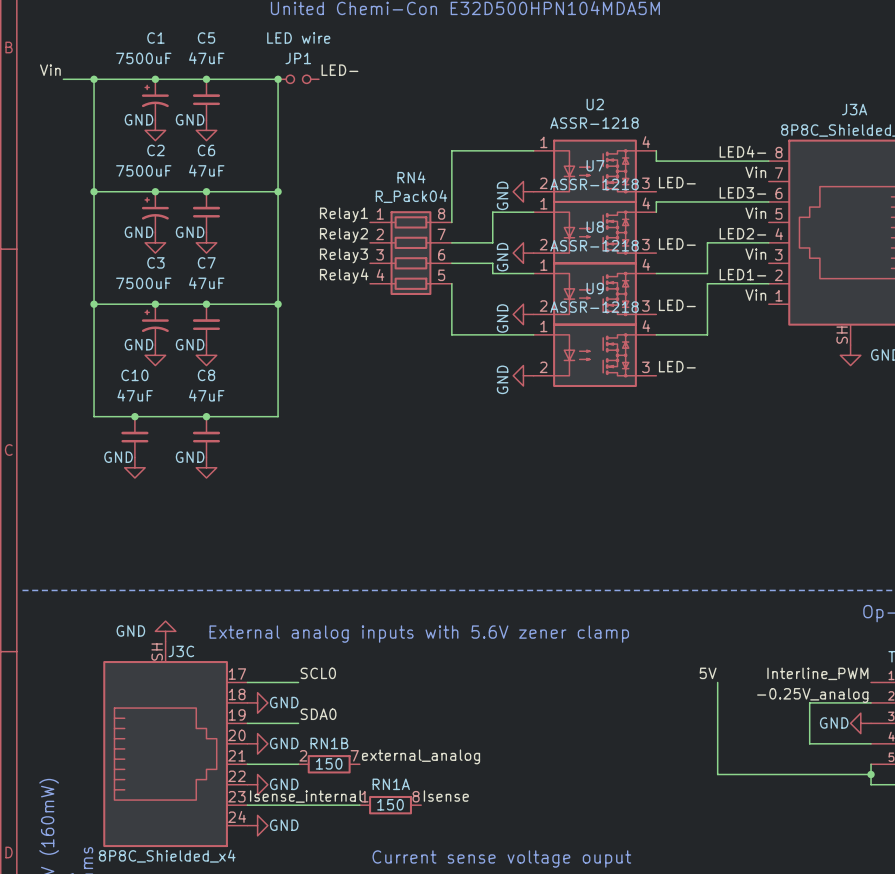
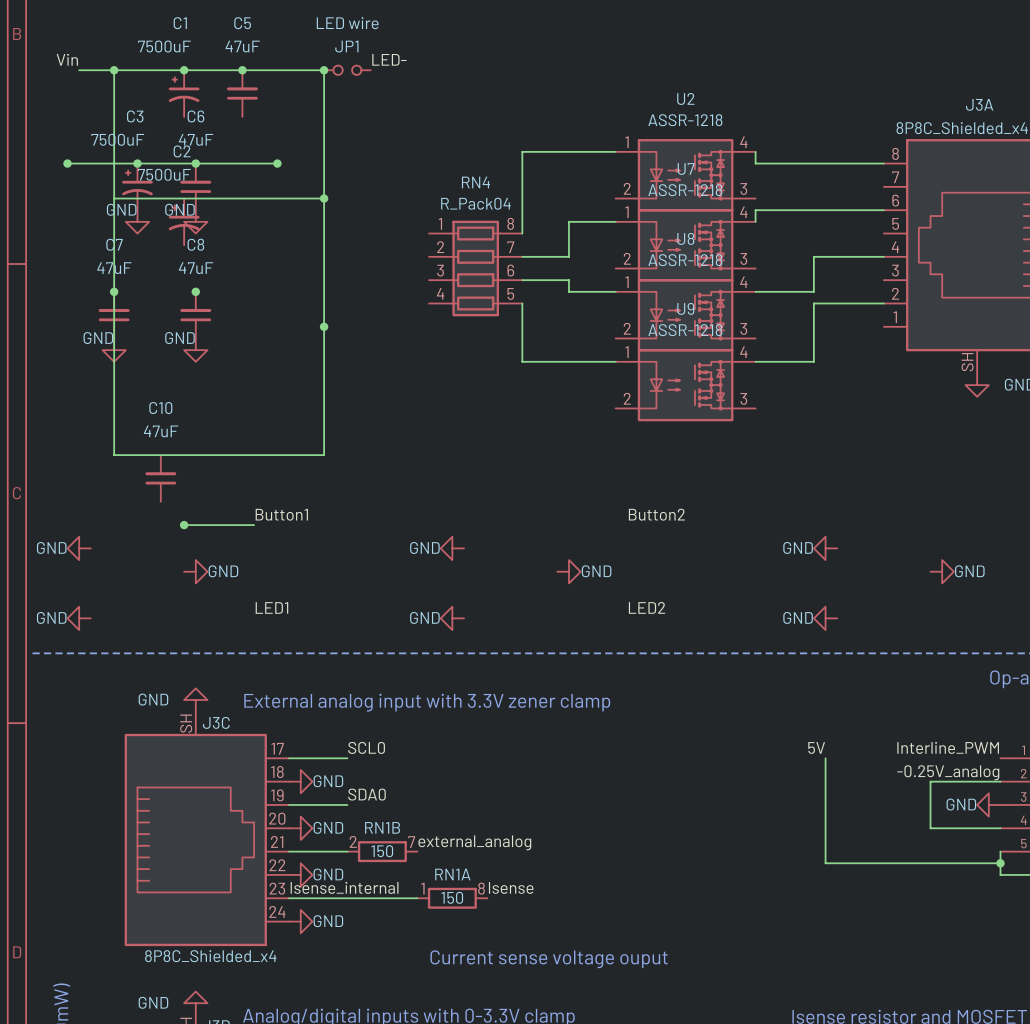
power symbol: GND (155, 130) -> none
power symbol: GND (206, 130) -> none
label: LED4- (742, 151) -> none
junction: none -> (67, 163)
junction: none -> (137, 163)
junction: none -> (195, 163)
junction: none -> (277, 163)
label: Vin (755, 172) -> none
label: LED- (677, 182) -> none
junction: (94, 191) -> none
junction: (155, 191) -> none
junction: (206, 191) -> none
power symbol: GND (523, 191) -> none
label: LED3- (742, 192) -> none
power symbol: none -> GND (137, 221)
power symbol: none -> GND (195, 221)
C6 position: (206, 212) -> (195, 186)
label: Vin (755, 213) -> none
label: Relay1 (343, 214) -> none
label: LED2- (742, 233) -> none
label: Relay2 (343, 235) -> none
power symbol: GND (155, 242) -> none
power symbol: GND (206, 242) -> none
label: LED- (677, 243) -> none
power symbol: GND (523, 253) -> none
label: Vin (755, 254) -> none
label: Relay3 (343, 255) -> none
junction: none -> (195, 291)
label: LED1- (742, 274) -> none
label: Relay4 (344, 276) -> none
label: Vin (755, 295) -> none
wire: (94, 304) (278, 304) -> (67, 163) (277, 163)
junction position: (94, 304) -> (114, 291)
junction: (155, 304) -> none
junction: (206, 304) -> none
label: LED- (677, 305) -> none
power symbol: GND (523, 314) -> none
power symbol: none -> GND (114, 350)
C3 position: (155, 324) -> (137, 186)
power symbol: none -> GND (195, 350)
C7 position: (206, 324) -> (114, 315)
power symbol: GND (155, 355) -> none
power symbol: GND (206, 355) -> none
label: LED- (677, 366) -> none
power symbol: GND (523, 375) -> none
junction: (134, 416) -> none
junction: (206, 416) -> none
C8 position: (206, 437) -> (195, 315)
power symbol: GND (134, 467) -> none
power symbol: GND (206, 467) -> none
label: none -> Button1 (281, 514)
label: none -> Button2 (656, 514)
wire: none -> (184, 525) (254, 525)
junction: none -> (184, 525)
power symbol: none -> GND (79, 548)
power symbol: none -> GND (452, 548)
power symbol: none -> GND (825, 548)
power symbol: none -> GND (195, 571)
power symbol: none -> GND (568, 571)
power symbol: none -> GND (942, 571)
label: none -> LED1 (271, 607)
label: none -> LED2 (646, 607)
power symbol: none -> GND (79, 618)
power symbol: none -> GND (452, 618)
power symbol: none -> GND (825, 618)
text: External analog inputs with 5.6V zener clamp (419, 634) -> External analog input with 3.3V zener clamp (427, 702)

